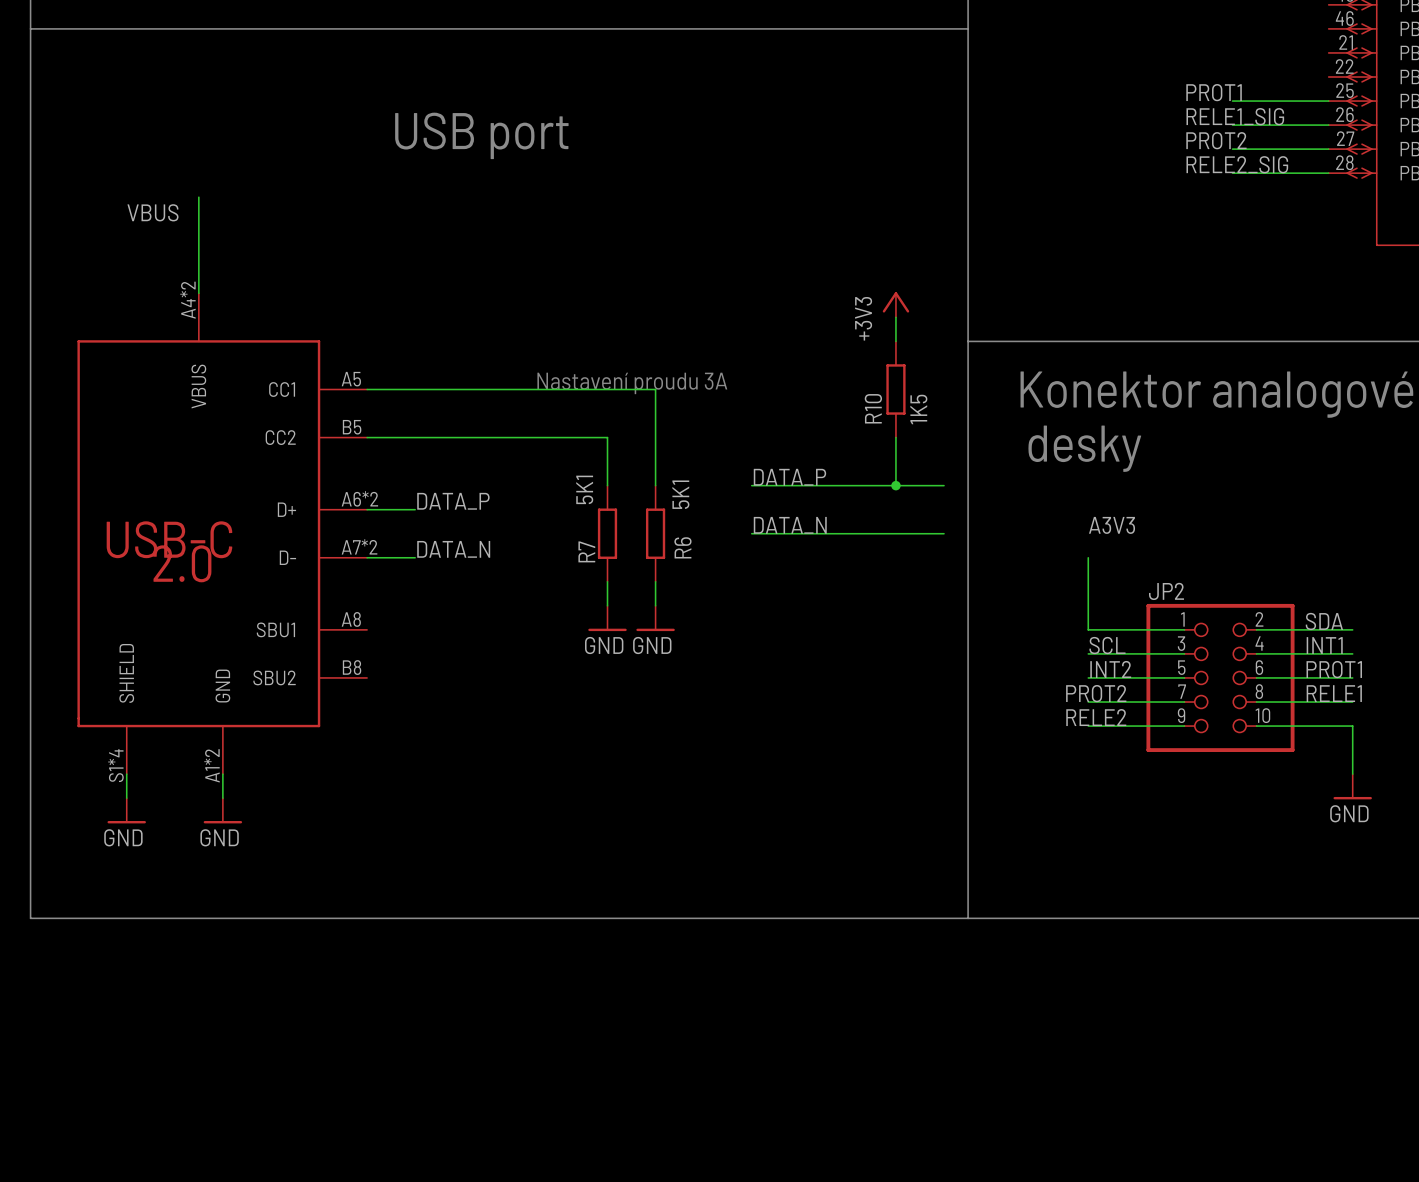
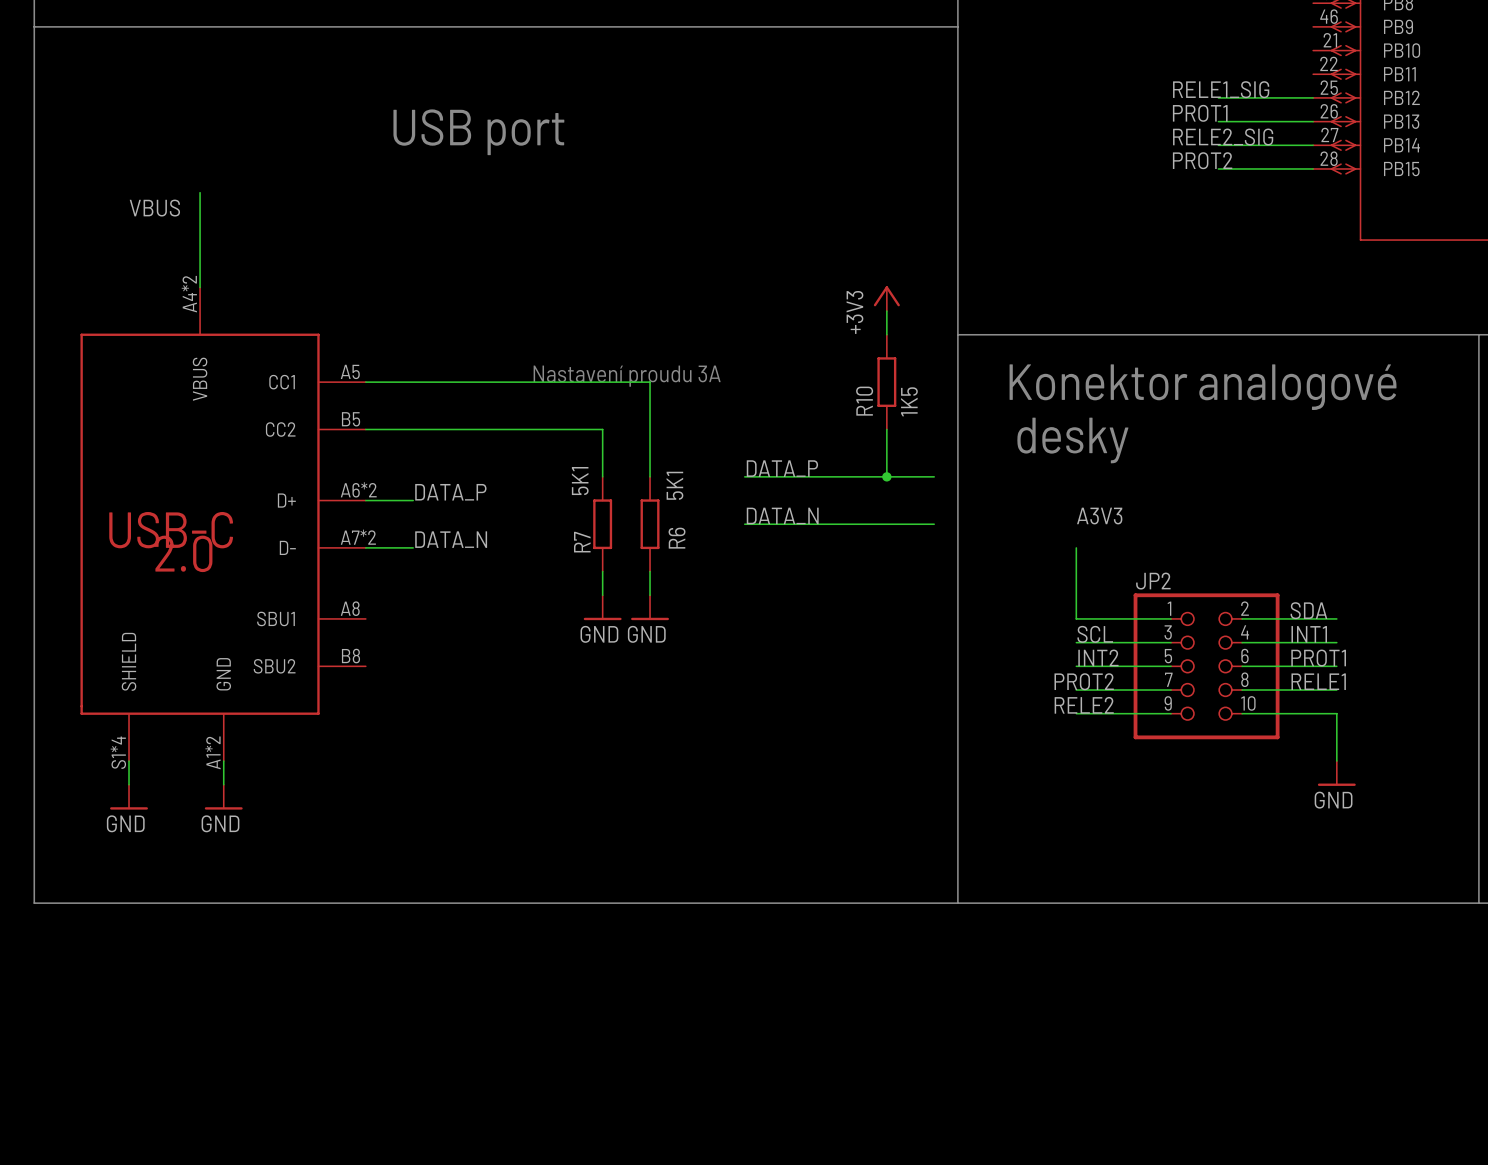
label: PROT1 (1214, 92) -> RELE1_SIG (1221, 89)
label: RELE1_SIG (1235, 116) -> PROT1 (1200, 113)
label: PROT2 (1216, 140) -> RELE2_SIG (1223, 137)
label: RELE2_SIG (1237, 164) -> PROT2 (1202, 160)

